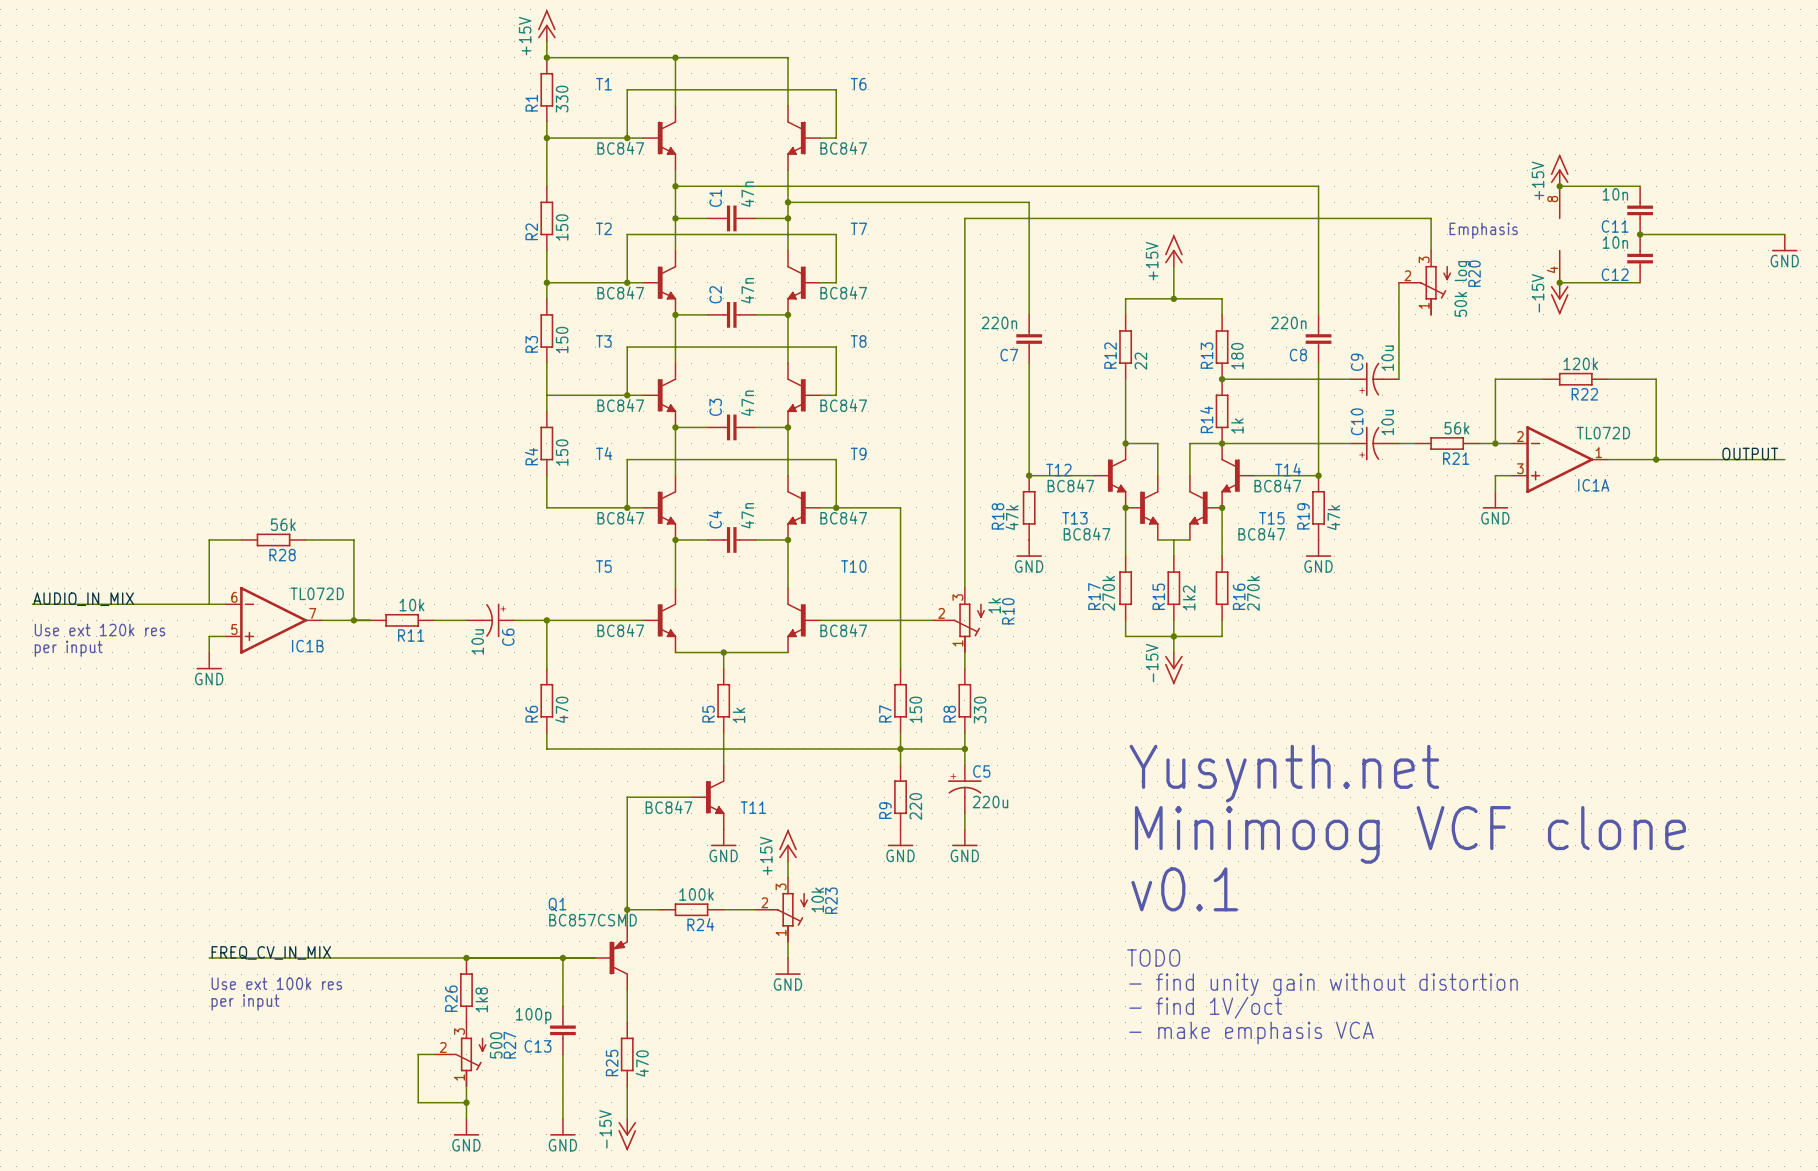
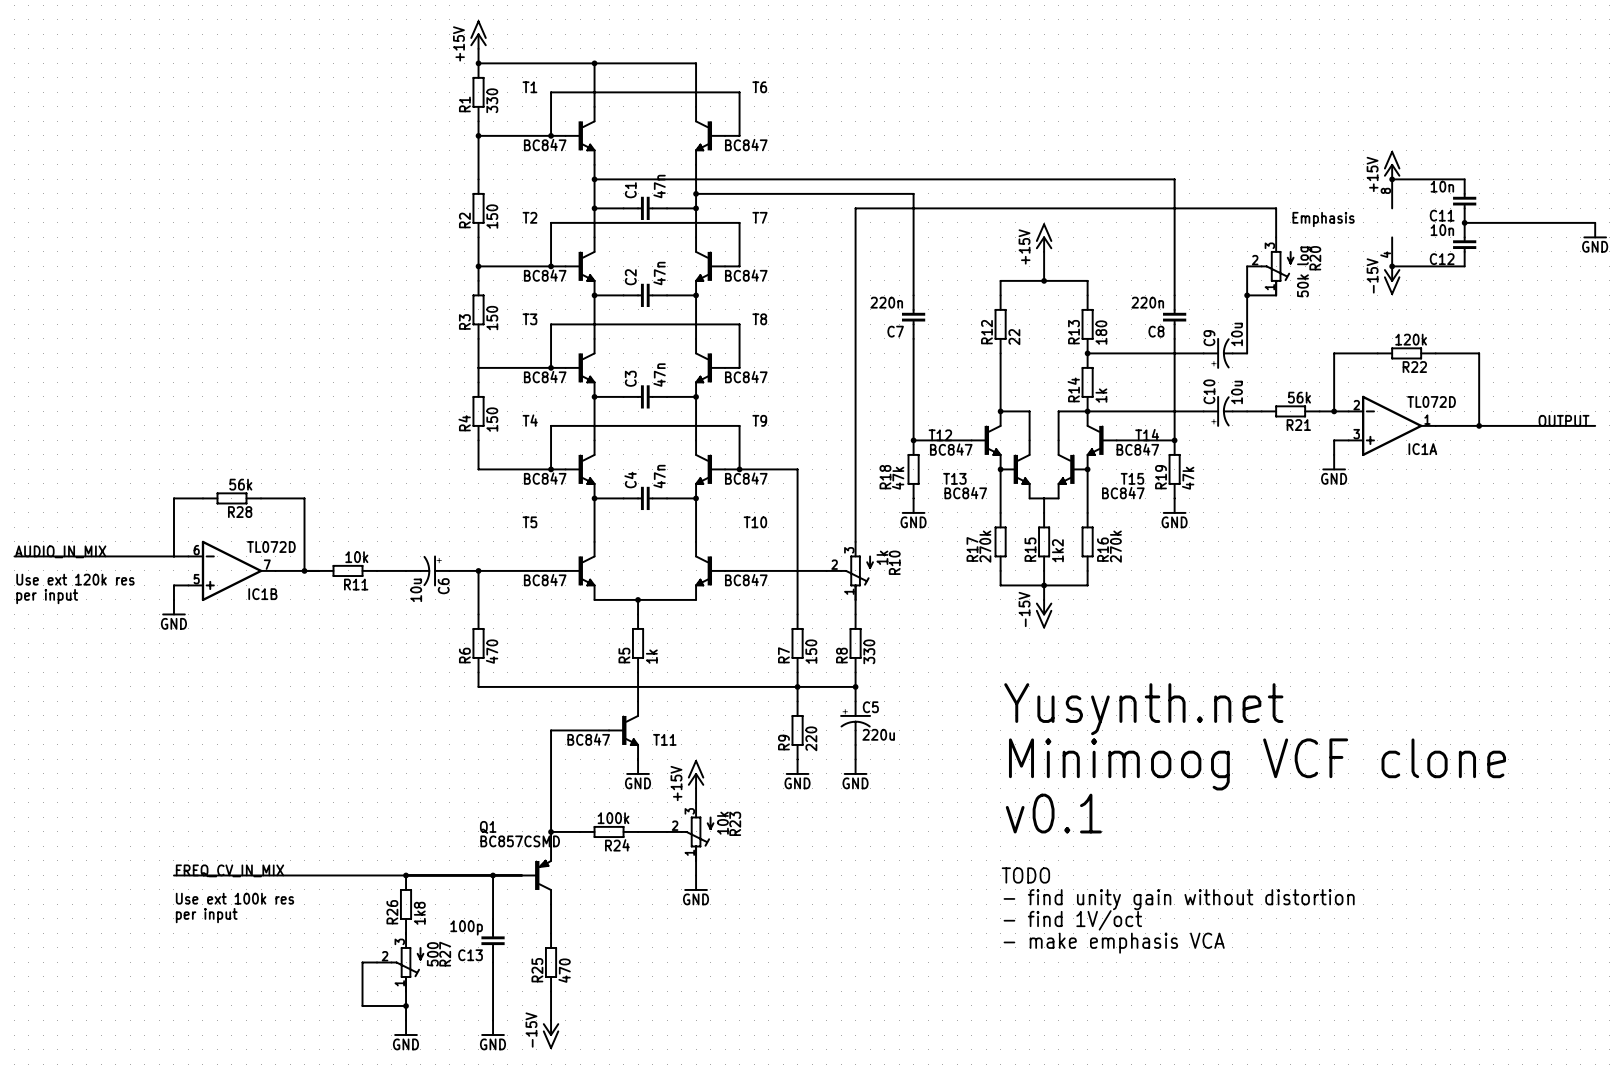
wire: none -> (1247, 295) (1276, 295)
junction: none -> (1247, 295)

